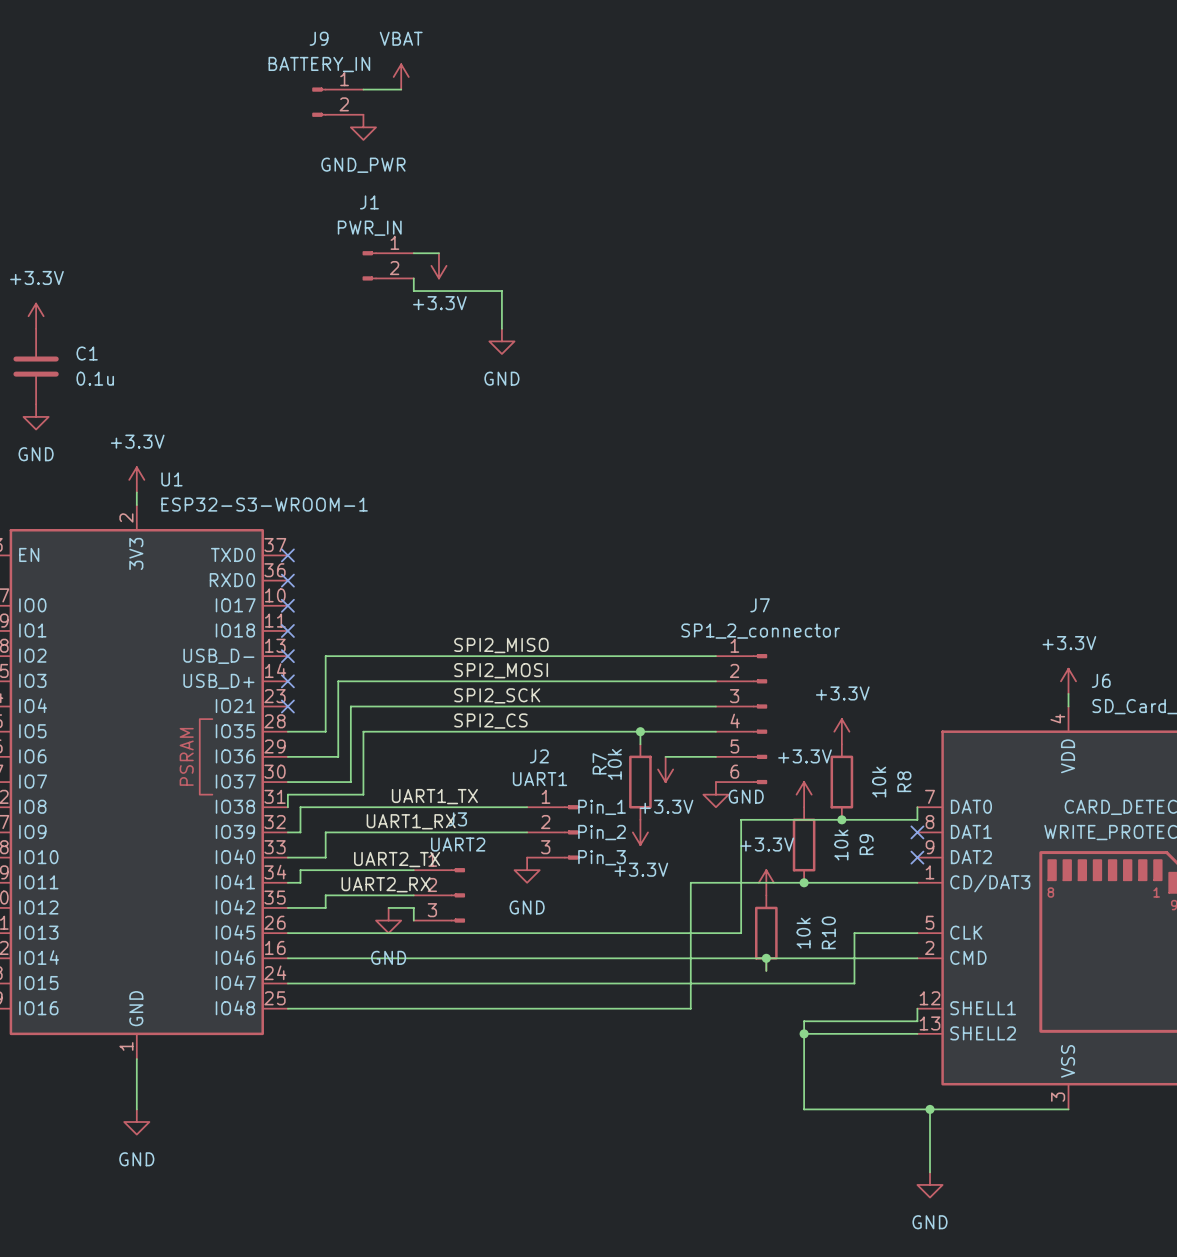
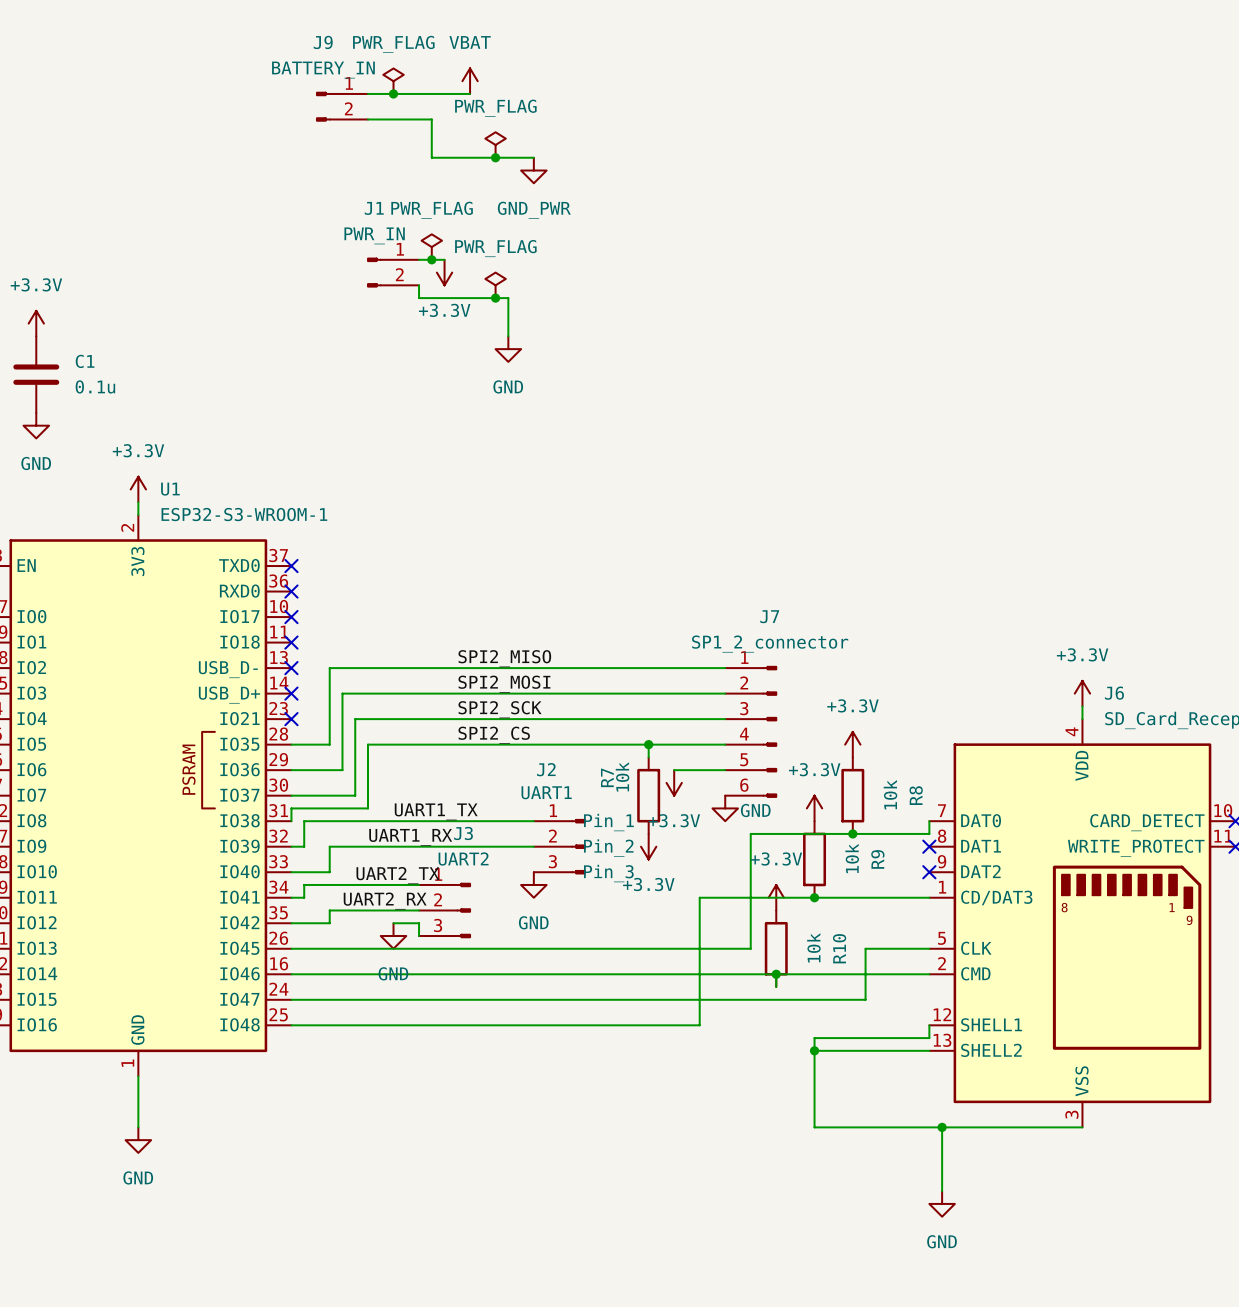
power symbol: none -> PWR_FLAG (393, 81)
power symbol position: VBAT (401, 76) -> VBAT (470, 81)
junction: none -> (393, 93)
wire: none -> (406, 93) (470, 93)
wire: none -> (368, 119) (431, 119) (431, 157) (533, 157)
power symbol position: GND_PWR (363, 127) -> GND_PWR (533, 170)
power symbol: none -> PWR_FLAG (495, 145)
junction: none -> (495, 157)
power symbol: none -> PWR_FLAG (431, 247)
junction: none -> (431, 259)
power symbol: none -> PWR_FLAG (495, 285)
junction: none -> (495, 298)

